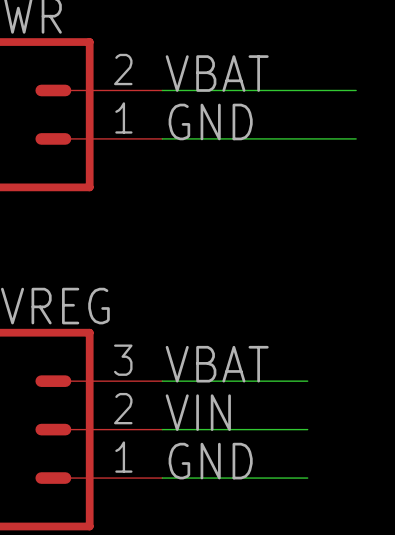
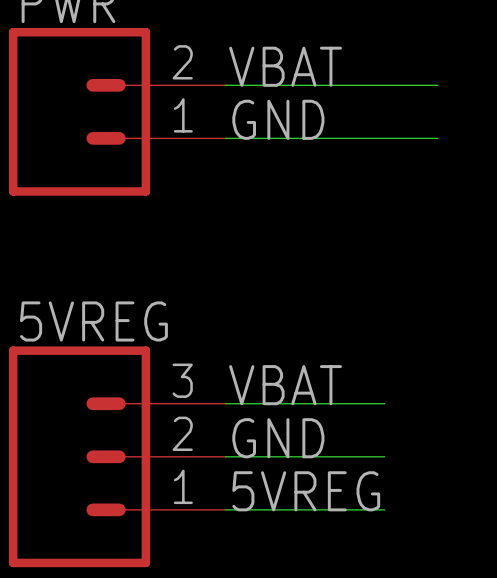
label: VIN (198, 412) -> GND (278, 438)
label: GND (210, 461) -> 5VREG (306, 491)

